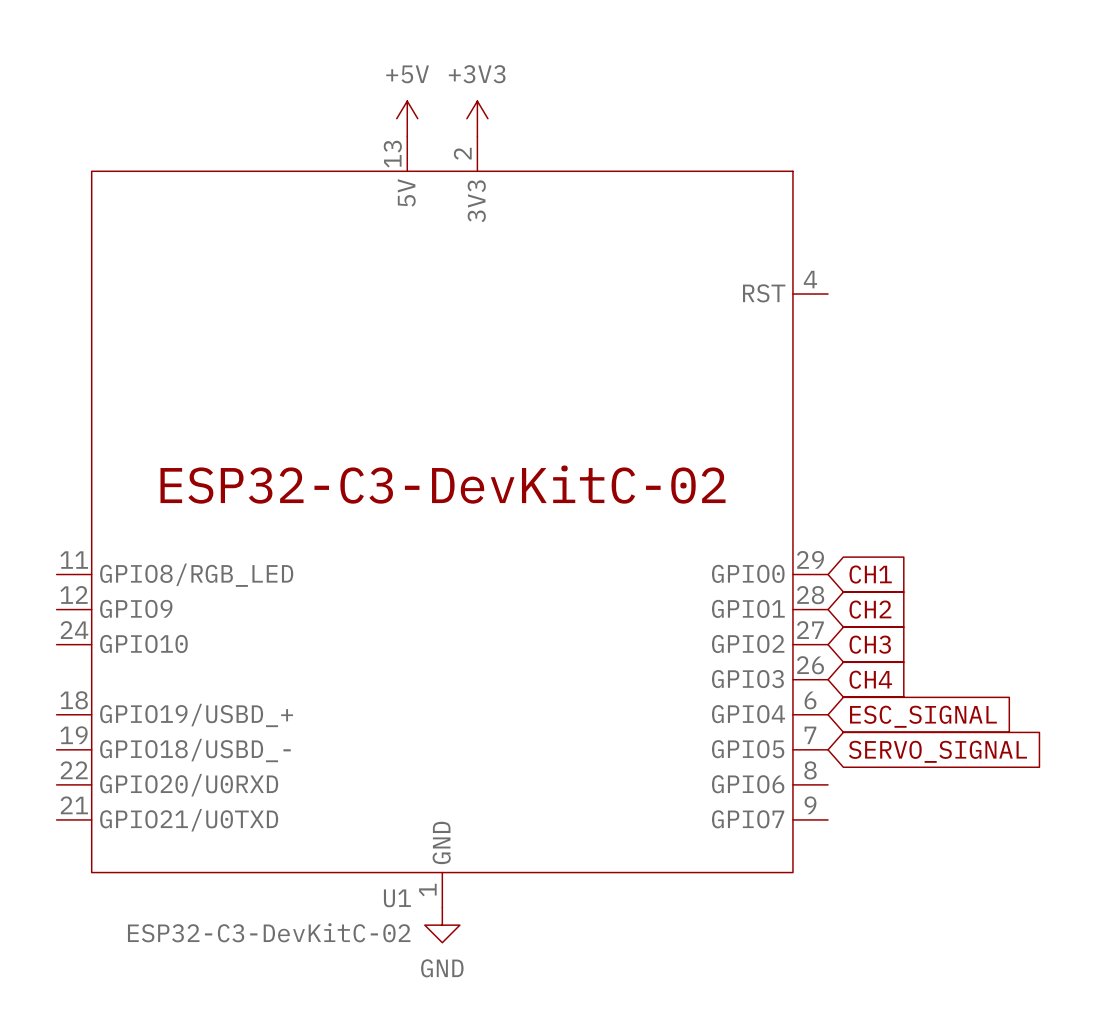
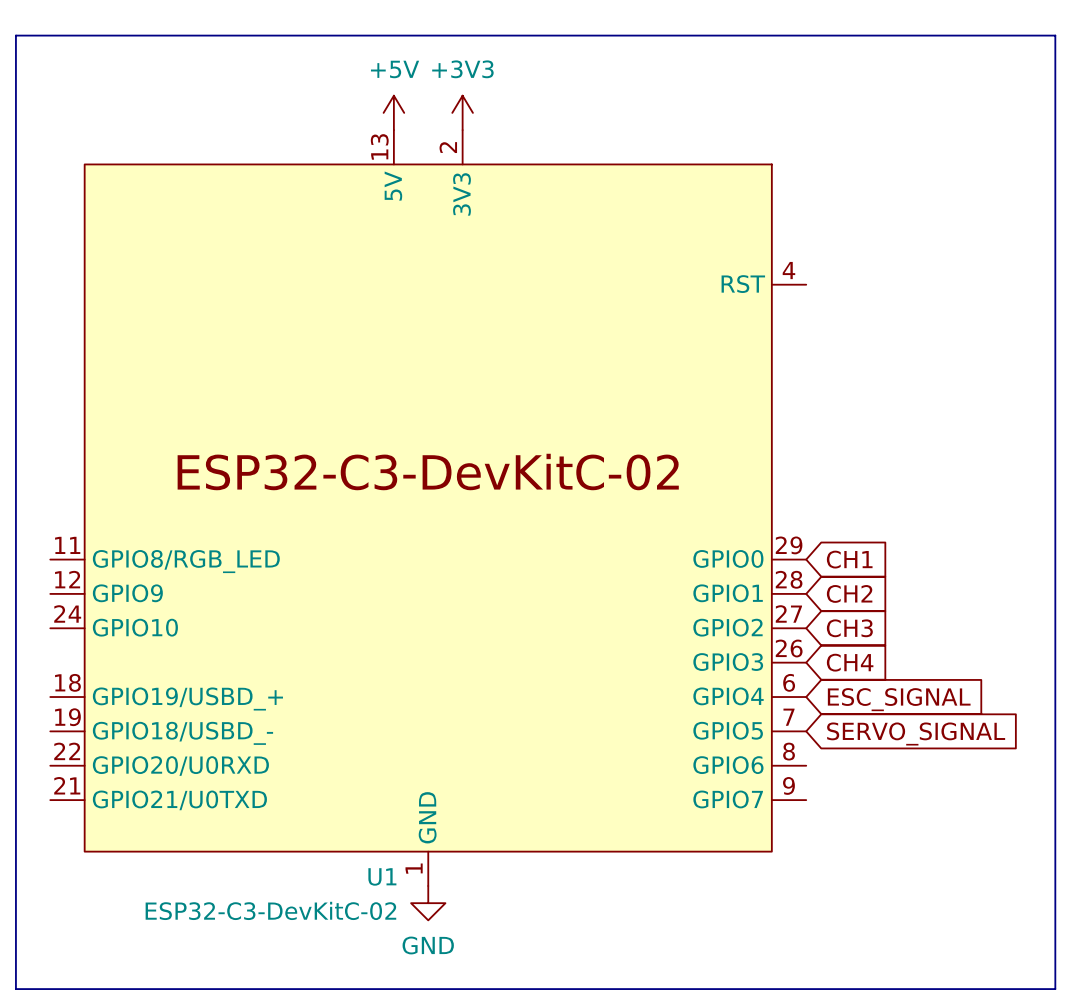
line: none -> (15, 35) (1055, 35) (1055, 989) (15, 989) (15, 35)

